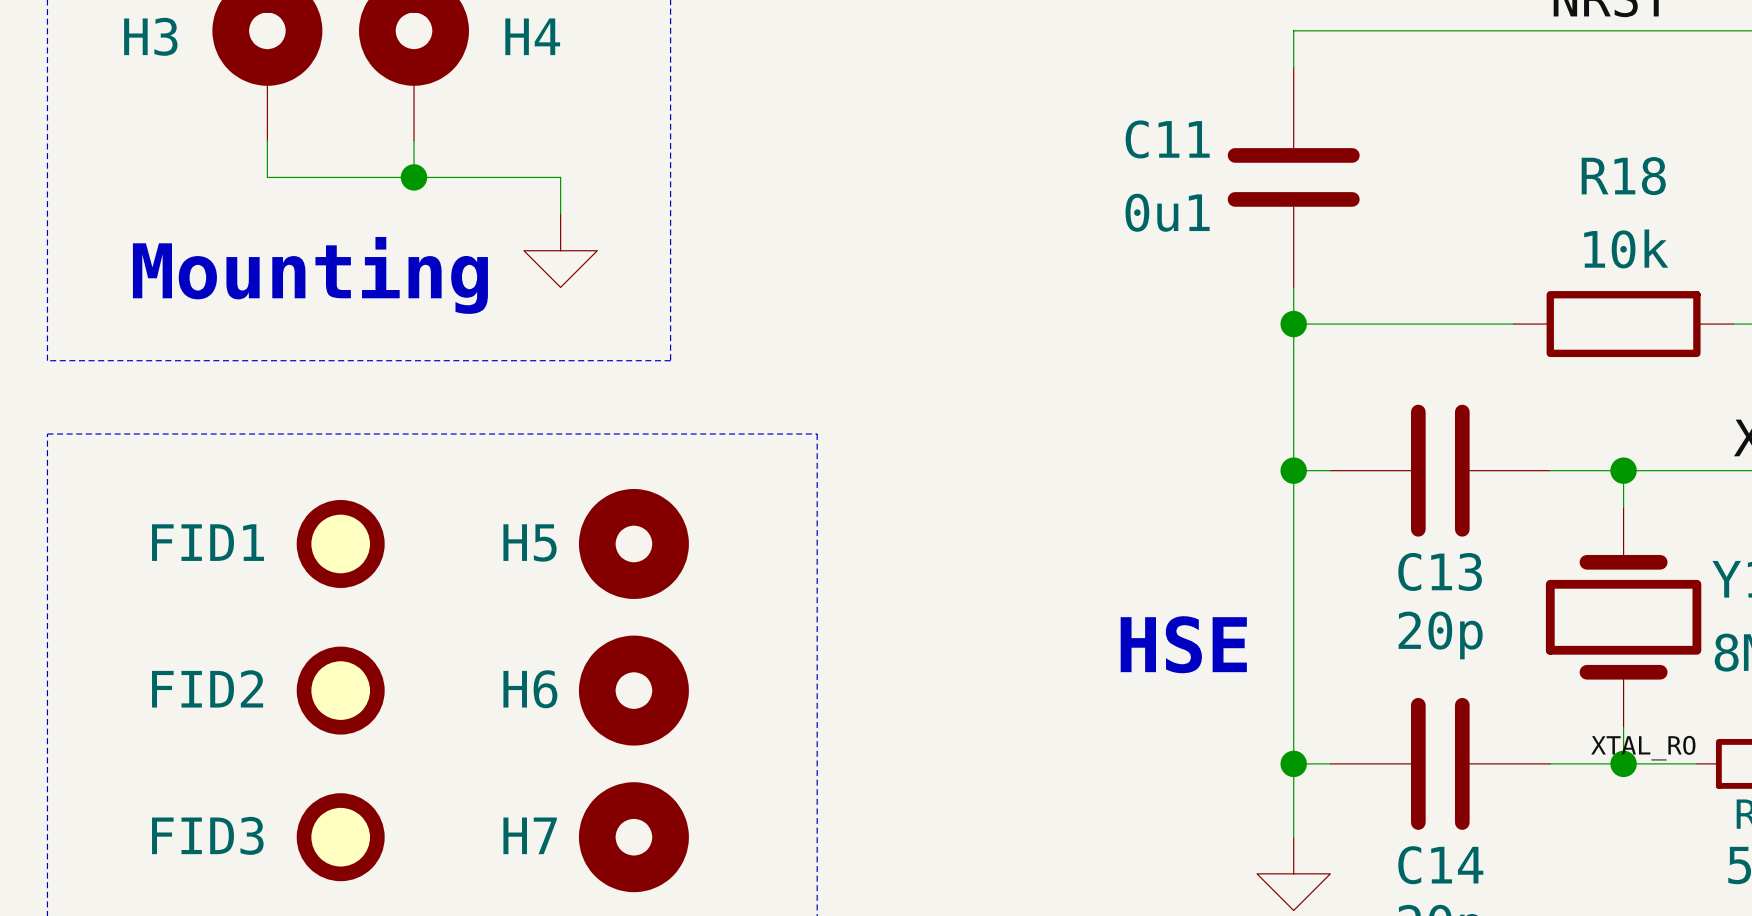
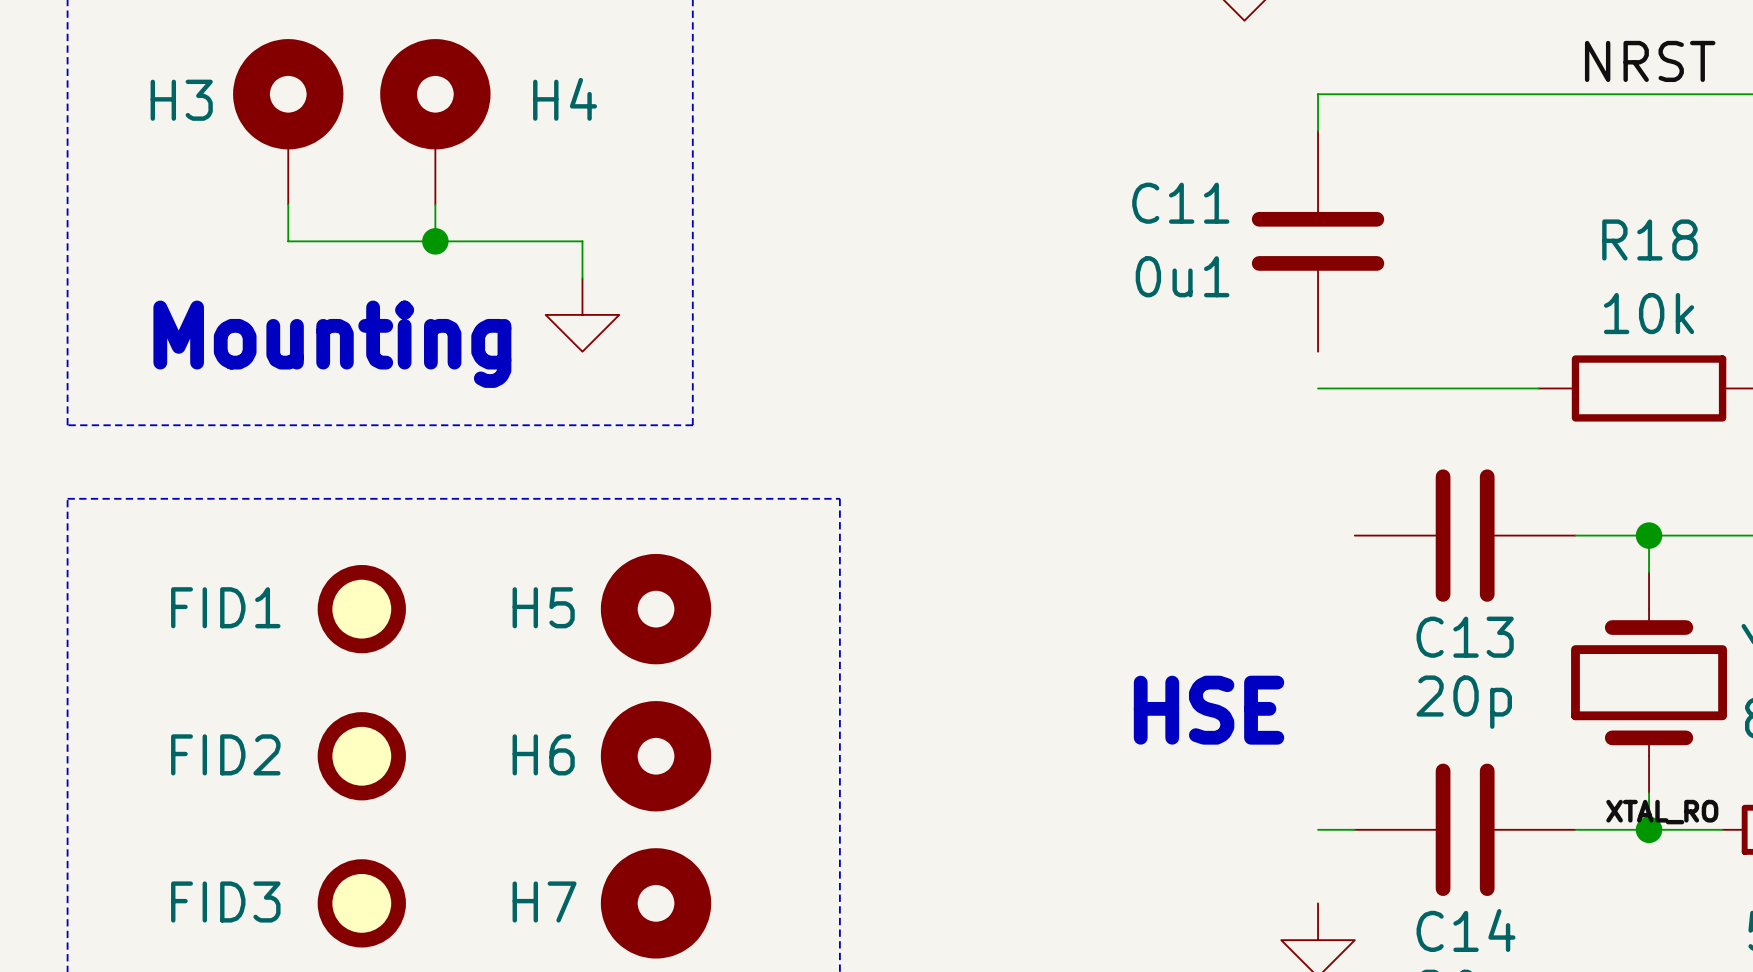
wire: (1293, 287) (1293, 837) -> none
junction: (1293, 324) -> none
wire: (1293, 470) (1330, 470) -> none
junction: (1293, 470) -> none
junction: (1293, 763) -> none

